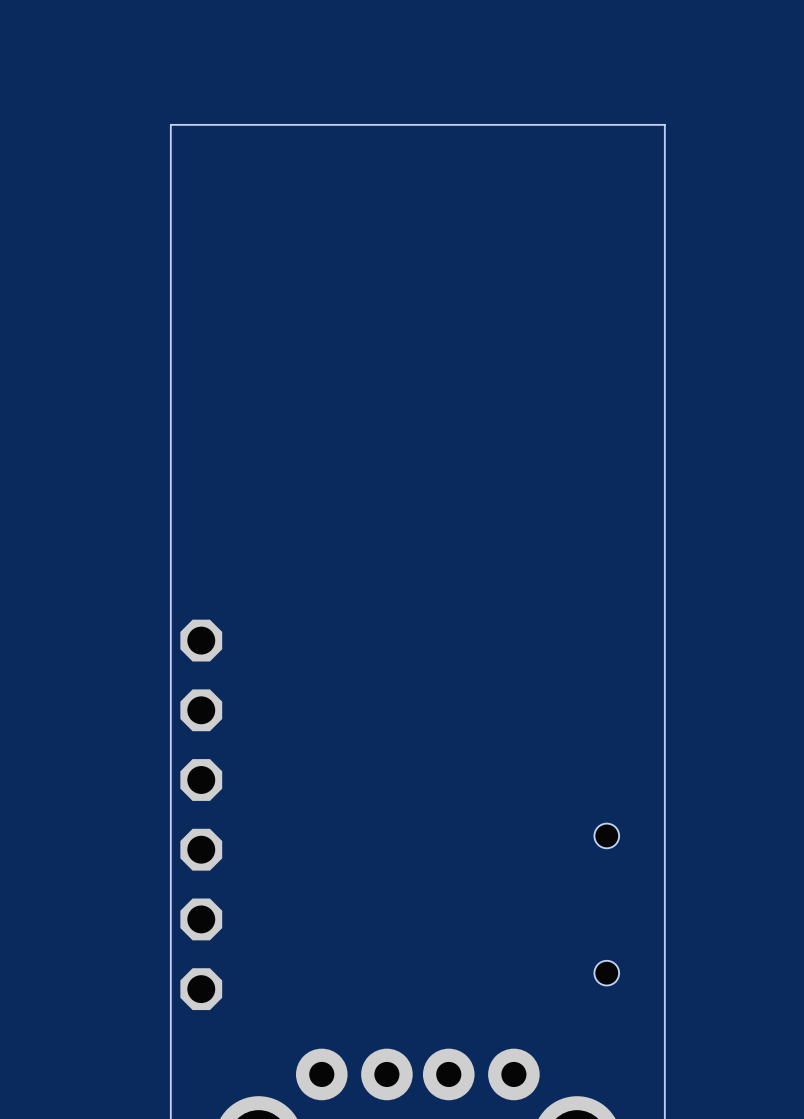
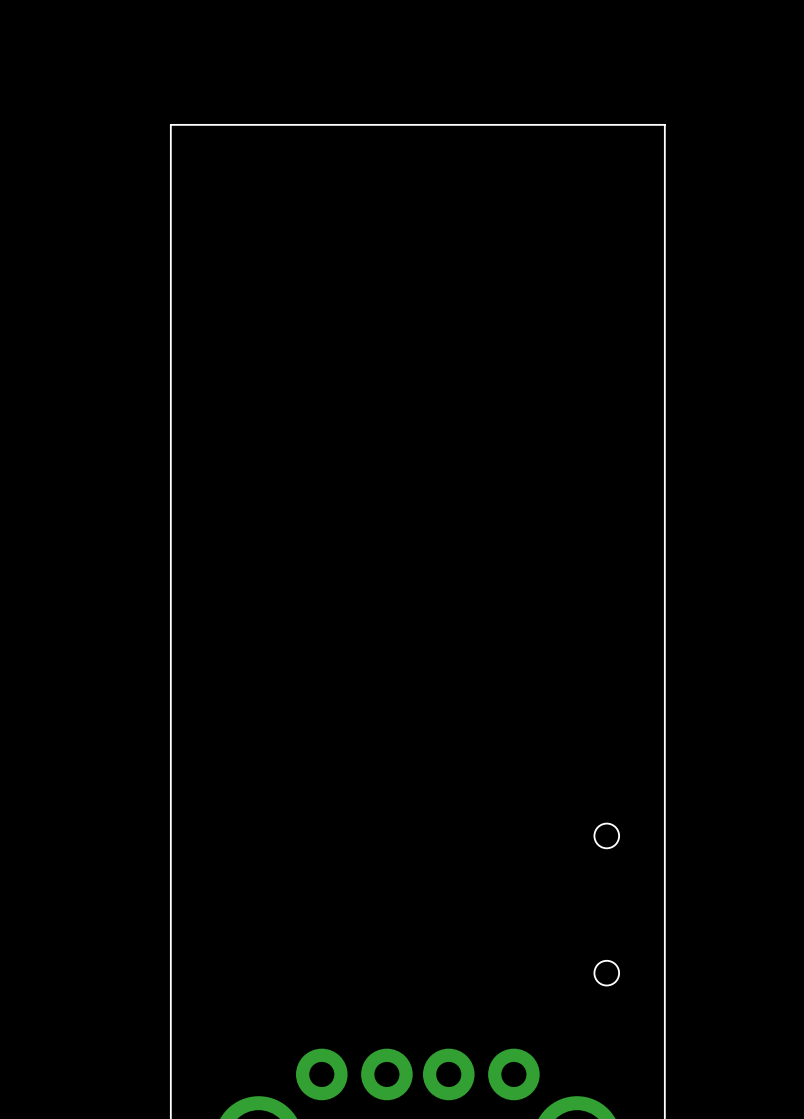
part: (201, 814) -> none

